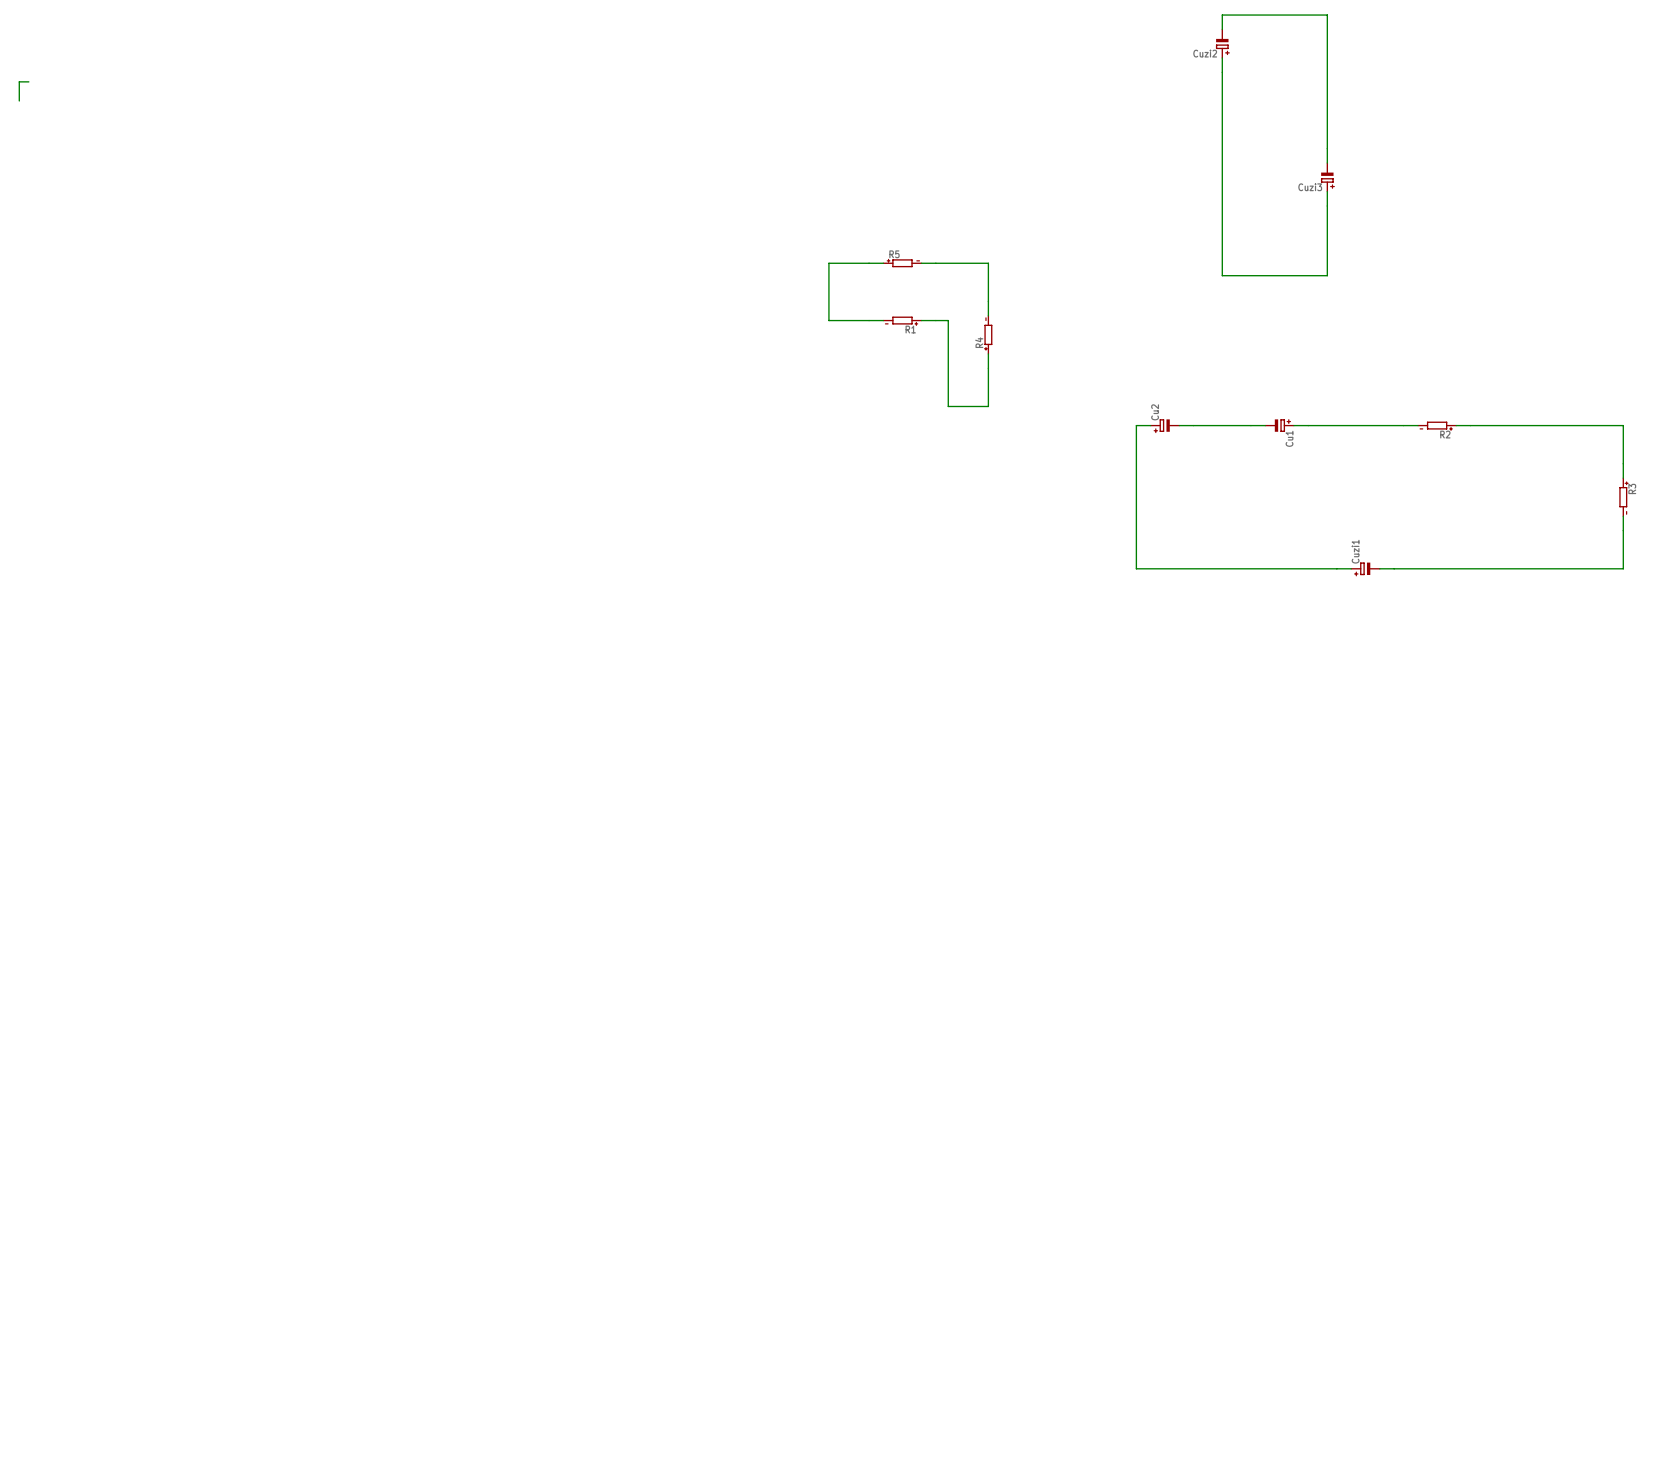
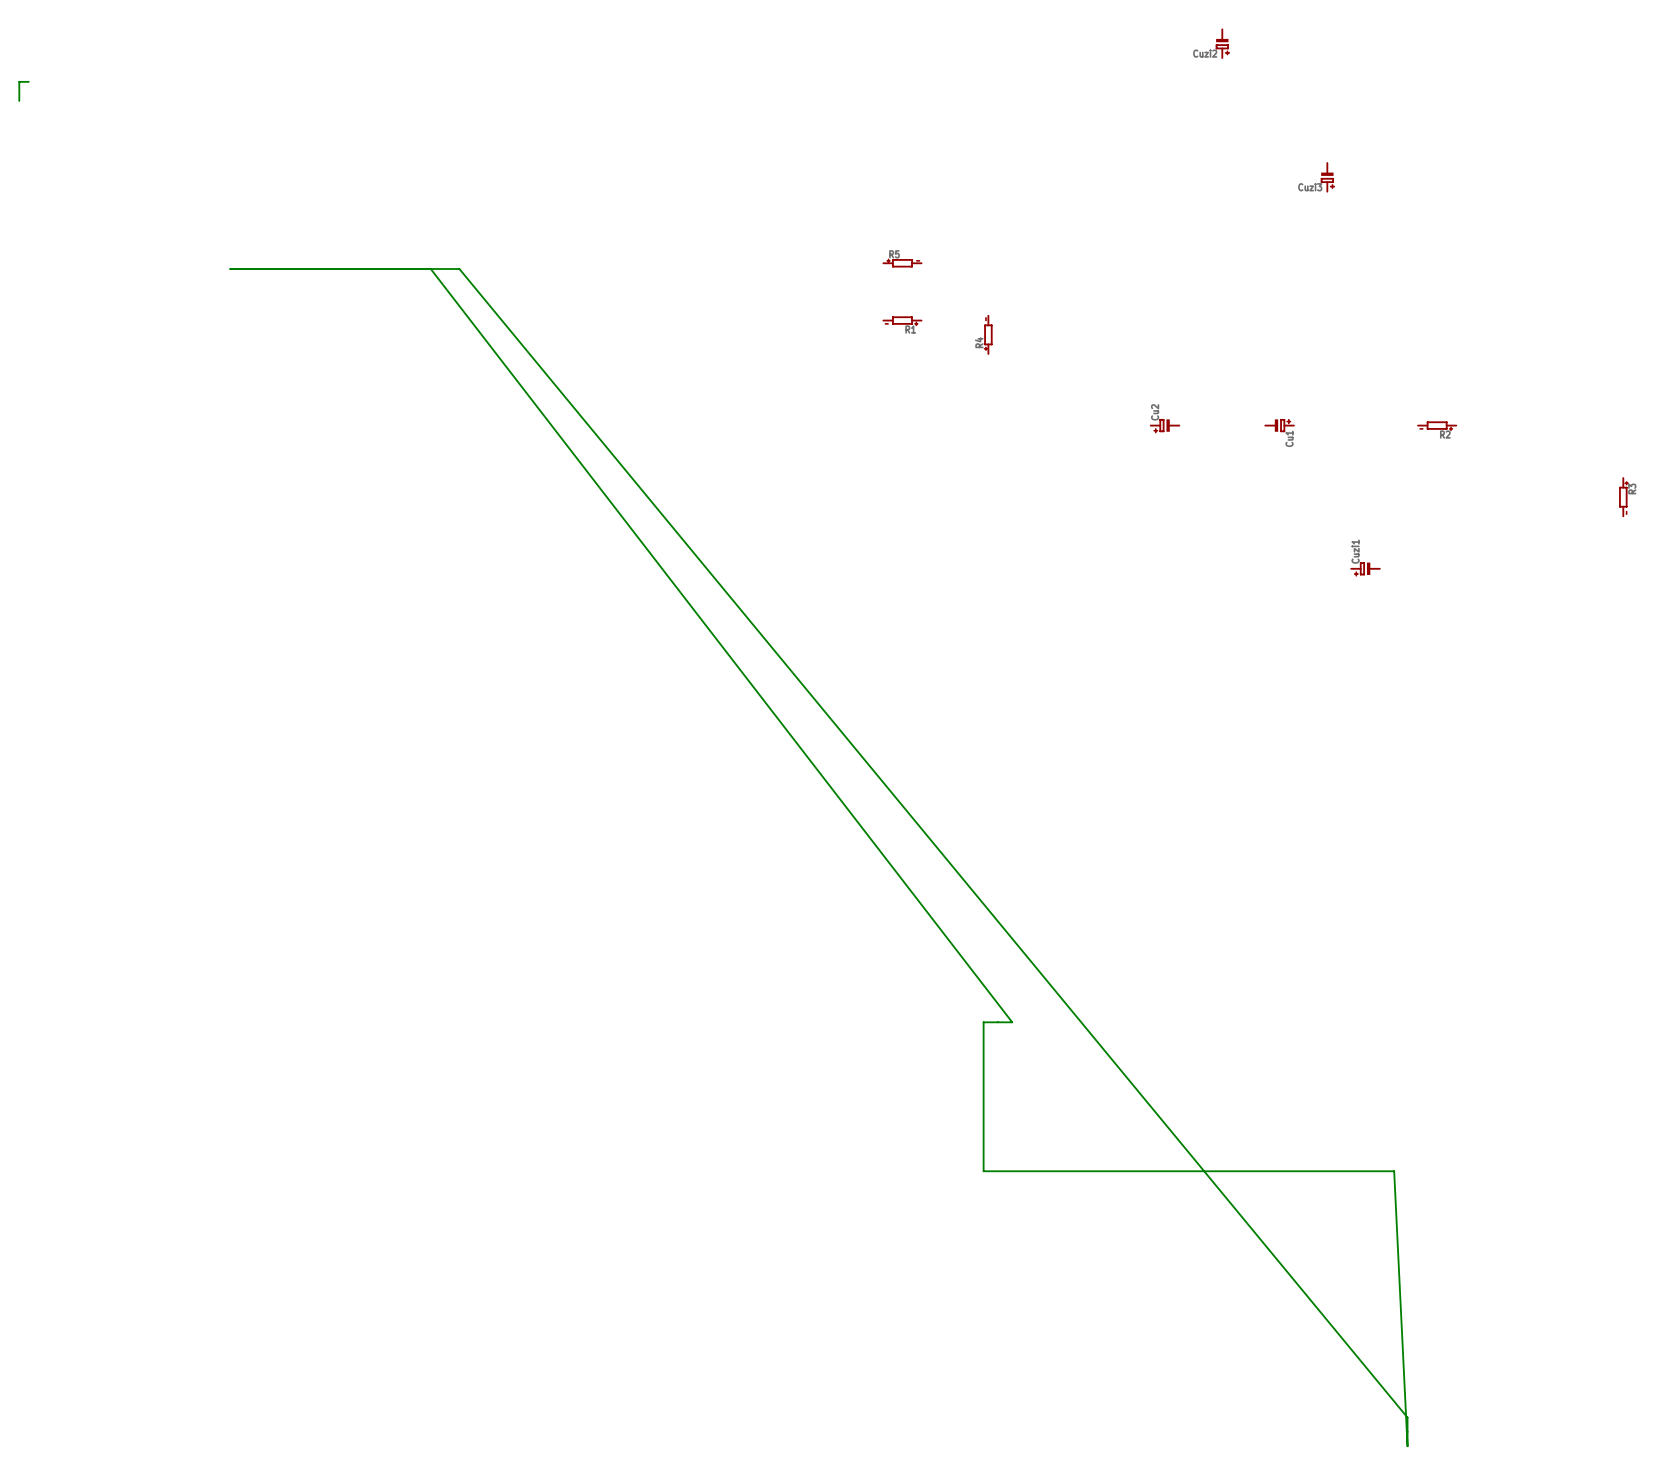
wire: (1222, 29) (1222, 15) (1327, 15) (1327, 163) -> none
wire: (1222, 58) (1222, 275) (1327, 275) (1327, 191) -> none
wire: (883, 263) (828, 263) (828, 320) (883, 320) -> none
wire: (921, 263) (988, 263) (988, 315) -> none
wire: none -> (230, 269) (459, 269) (1407, 1417) (1407, 1446) (1394, 1171) (983, 1171) (983, 1022) (1012, 1022) (430, 269)
wire: (921, 320) (948, 320) (948, 406) (988, 406) (988, 353) -> none
wire: (1150, 425) (1136, 425) (1136, 568) (1351, 568) -> none
wire: (1179, 425) (1265, 425) -> none
wire: (1293, 425) (1418, 425) -> none
wire: (1456, 425) (1623, 425) (1623, 478) -> none
wire: (1623, 516) (1623, 568) (1379, 568) -> none

